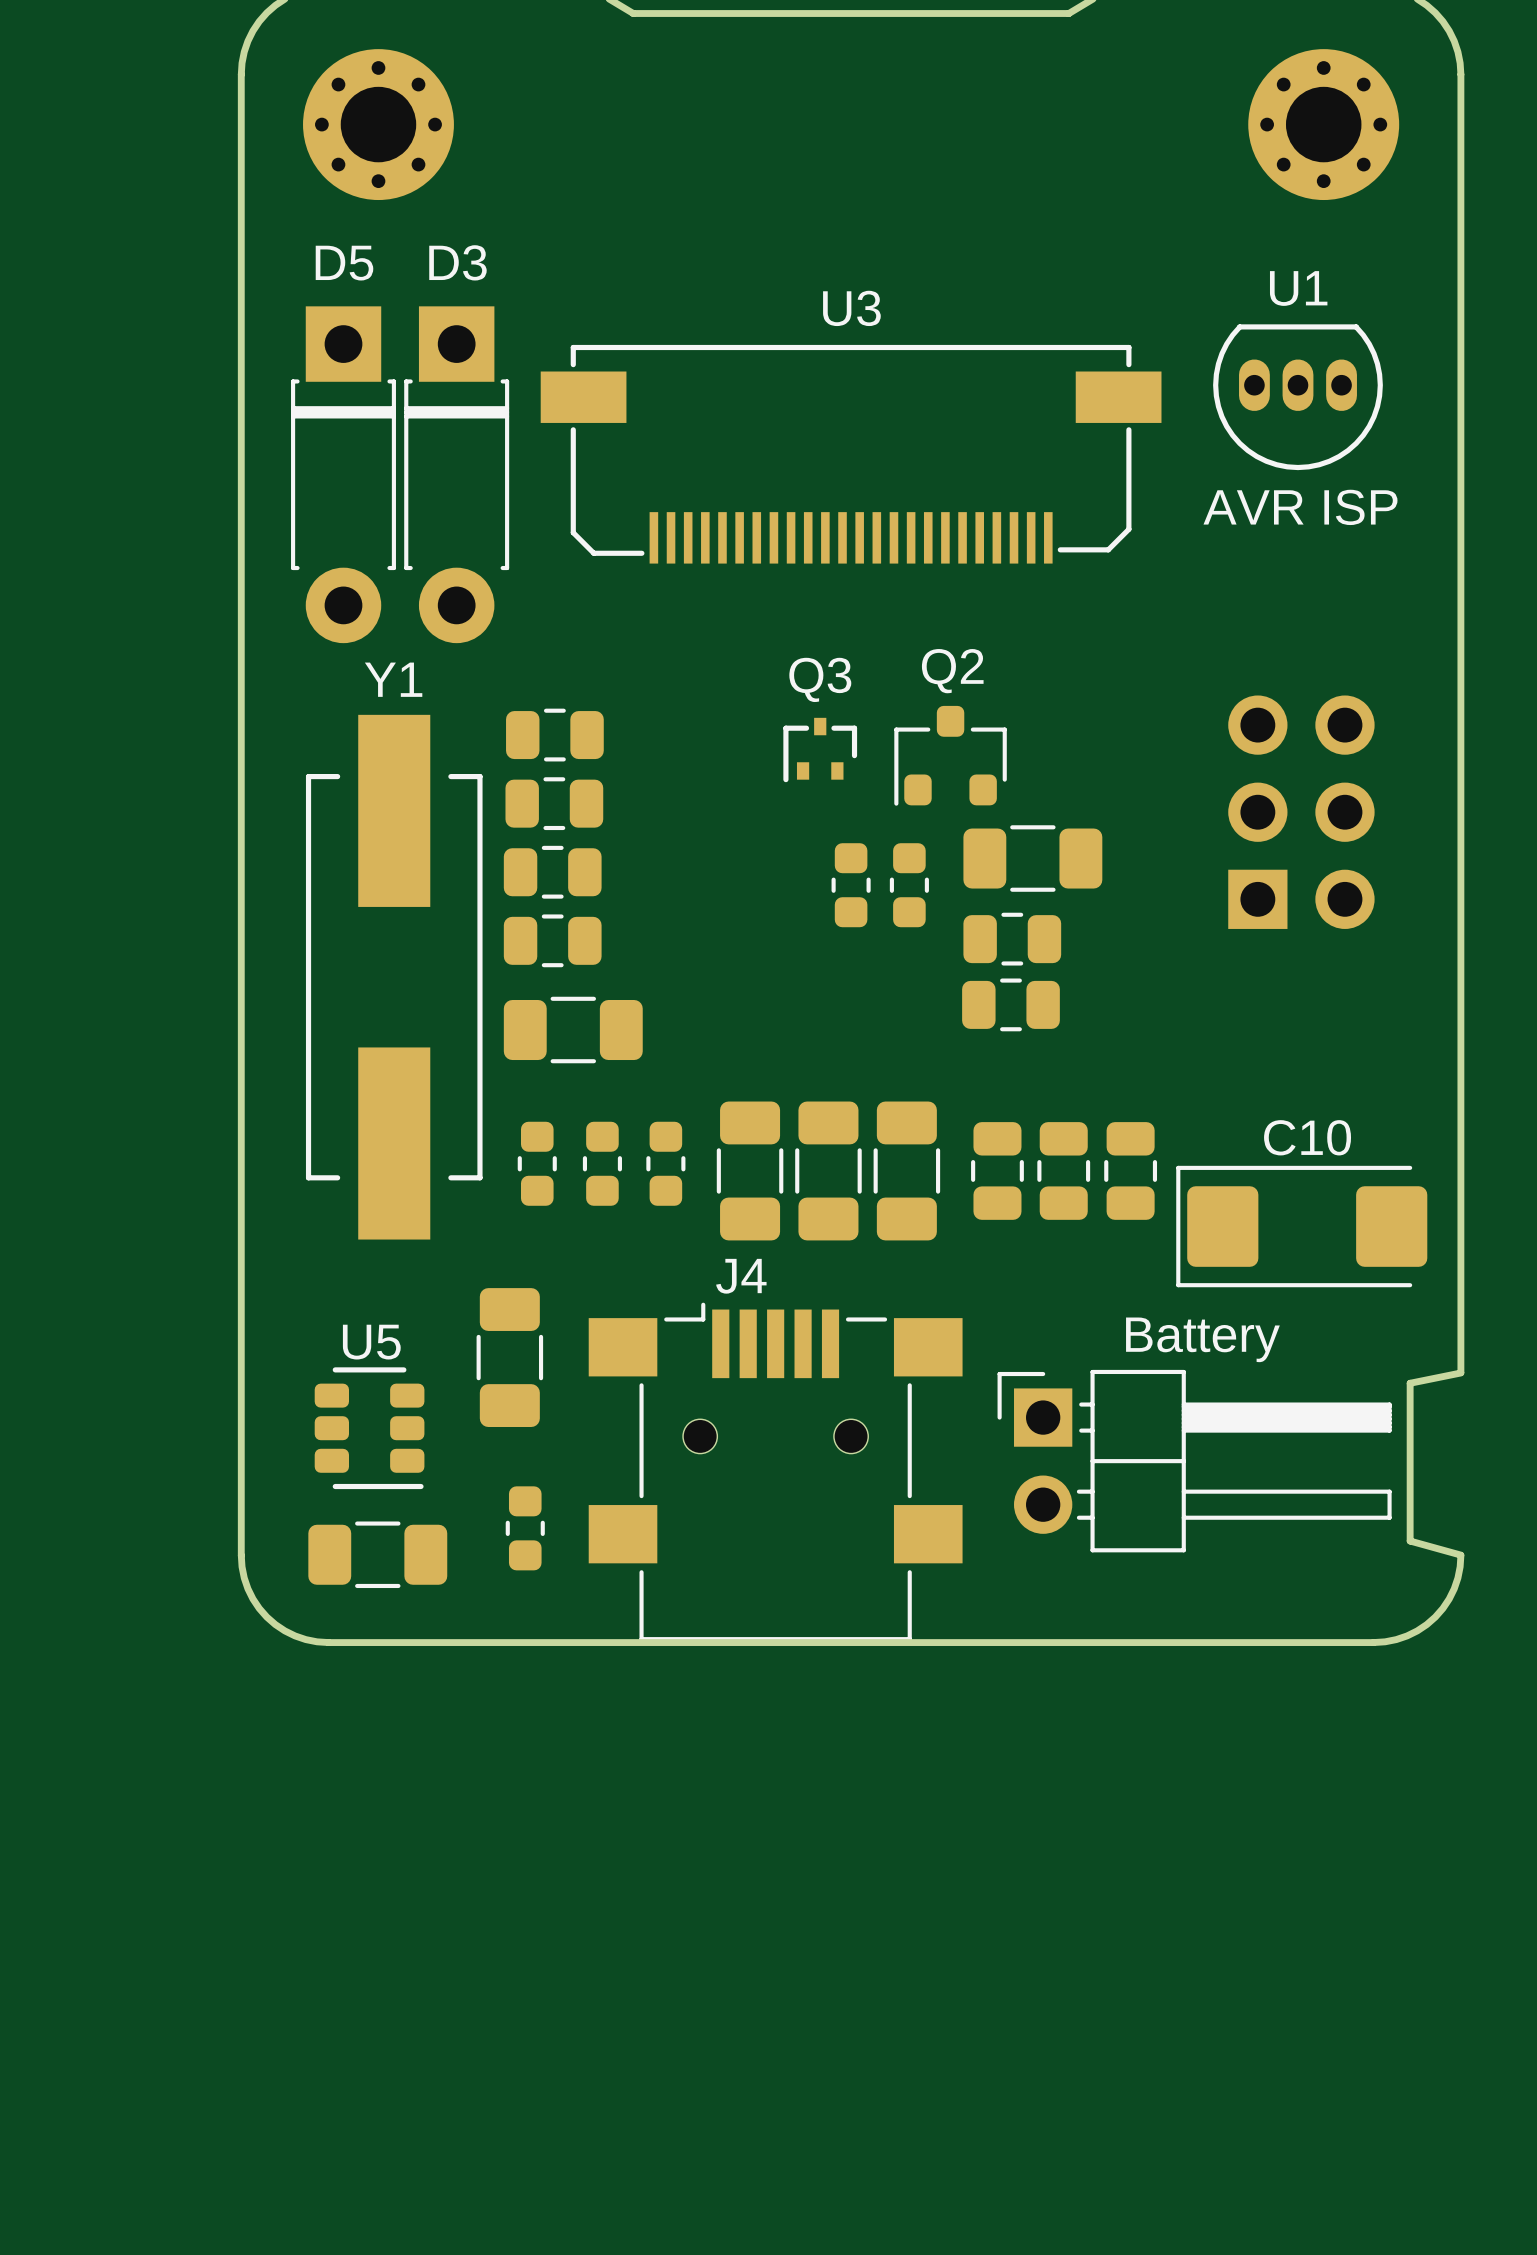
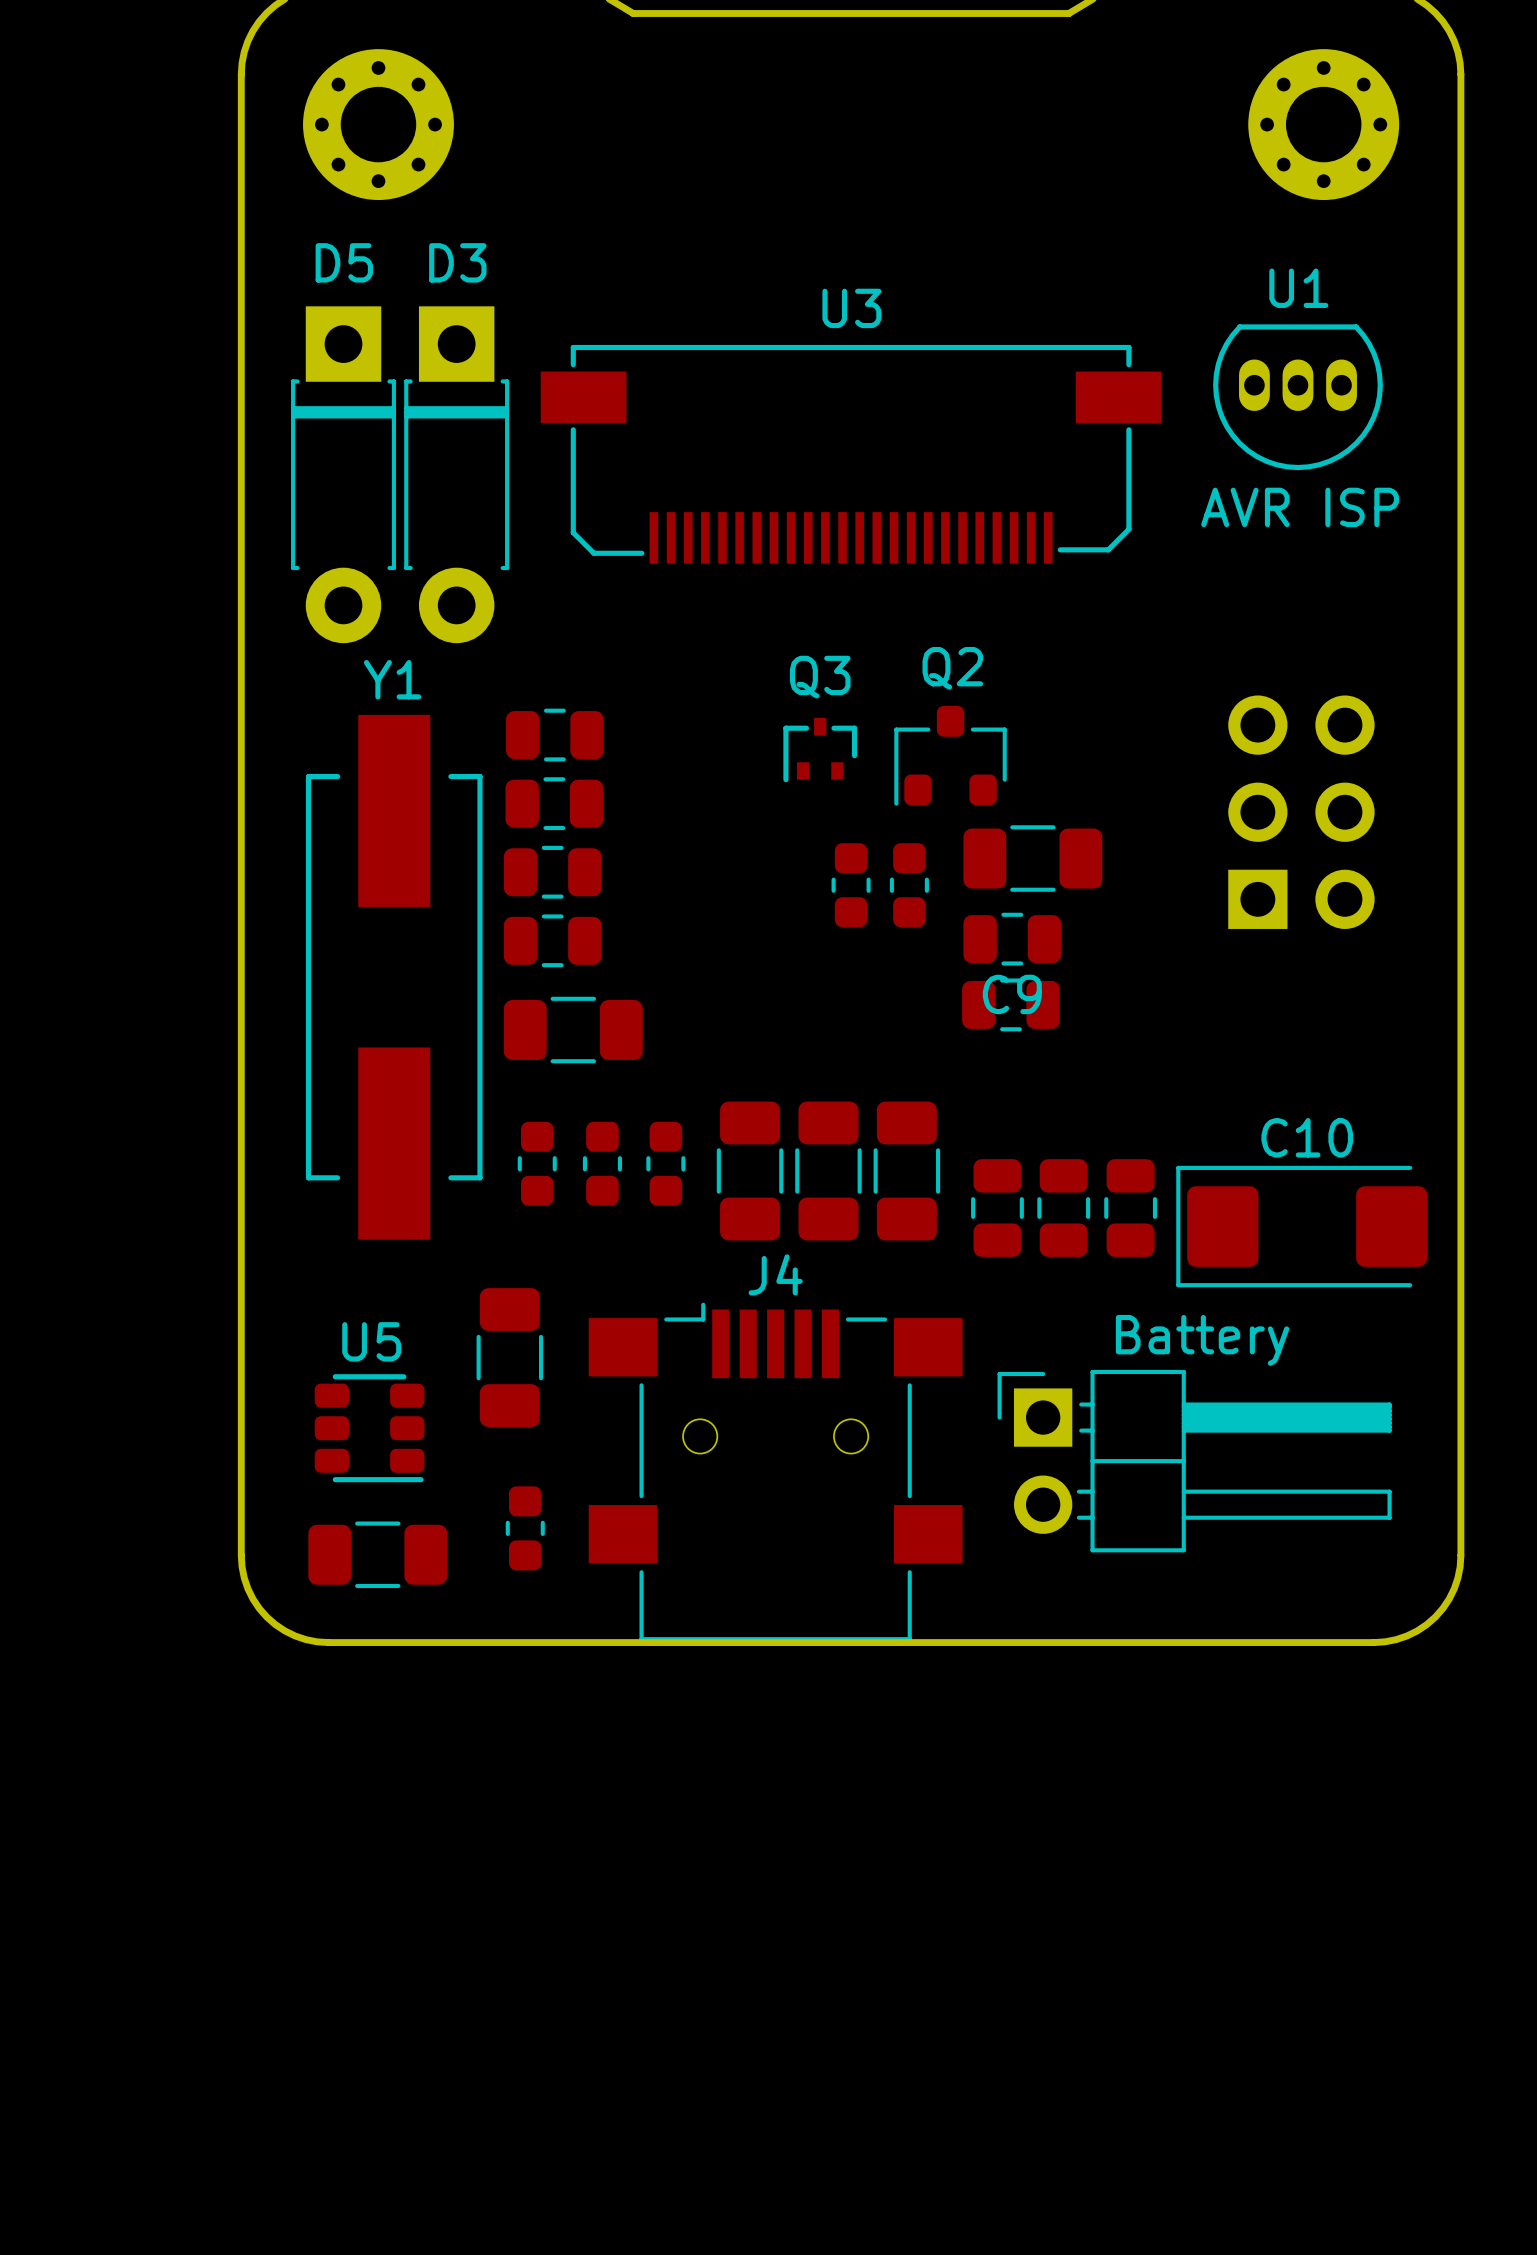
C9 name: none -> C9 (1012, 994)
part position: (997, 1170) -> (997, 1208)
part position: (1063, 1170) -> (1063, 1208)
part position: (1130, 1170) -> (1130, 1208)
J4 name position: J4 (741, 1276) -> J4 (775, 1274)
U5 footprint: [314, 1367, 425, 1490] -> [314, 1374, 425, 1483]
board edge: (1460, 1372) (1410, 1383) (1410, 1541) (1460, 1555) -> (1460, 1372) (1460, 1555)

